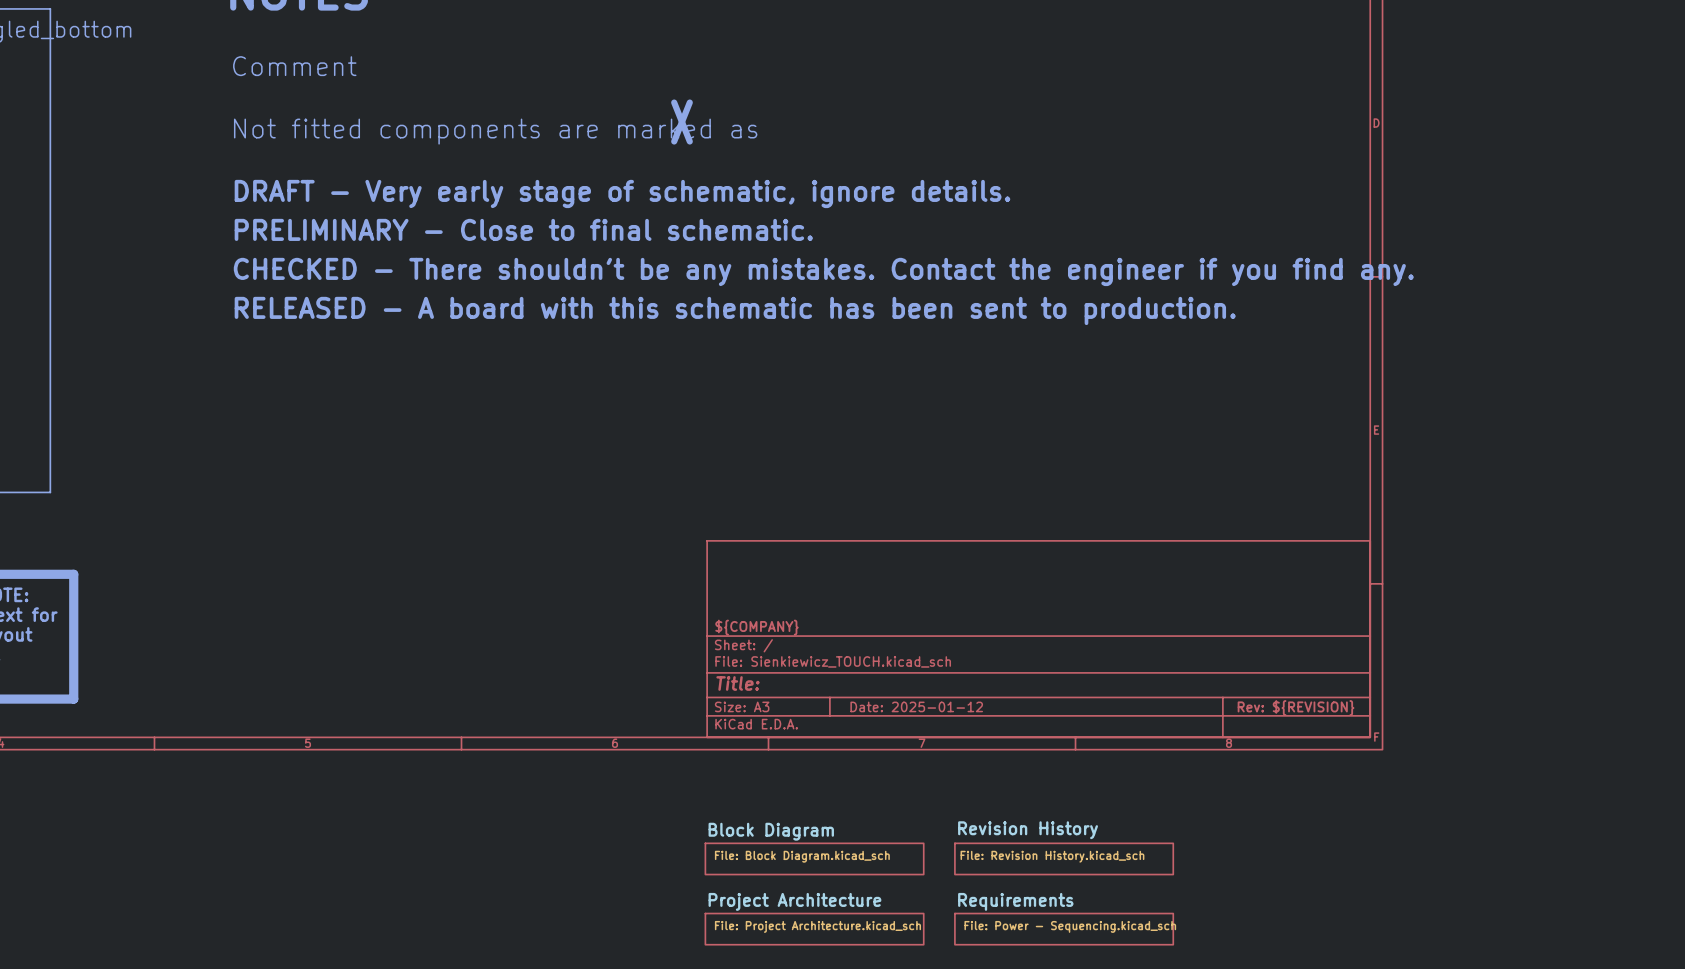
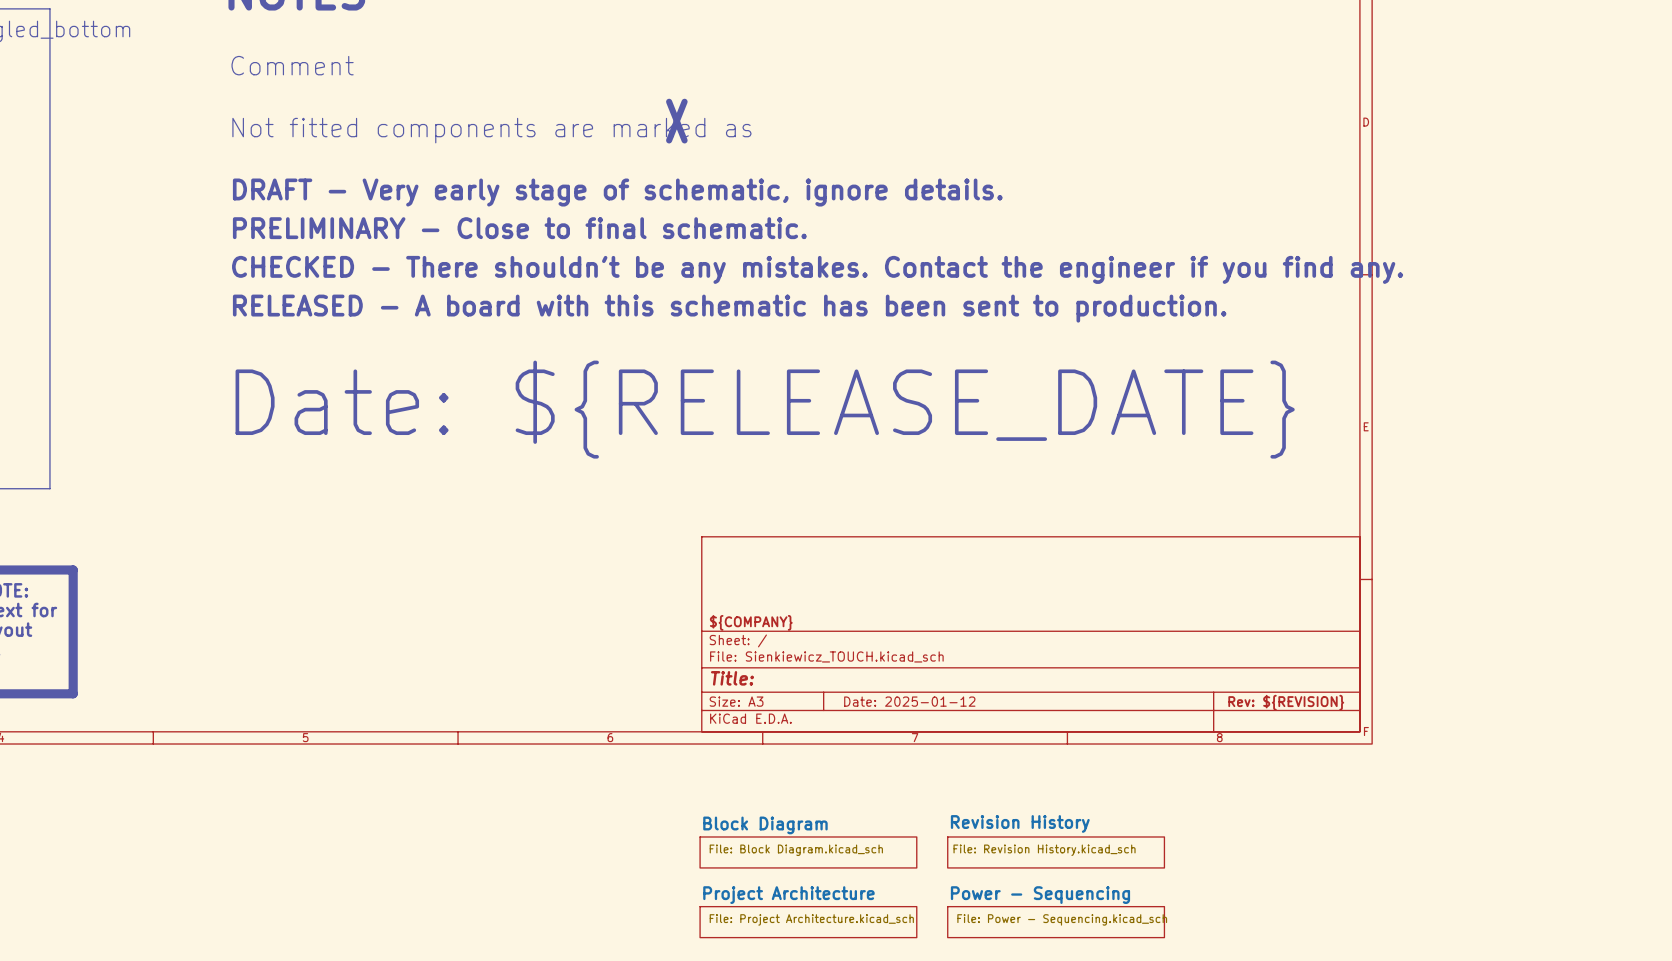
text: none -> Date: ${RELEASE_DATE} (765, 409)
sheet Requirements name: Requirements (1015, 901) -> Power - Sequencing (1040, 895)

